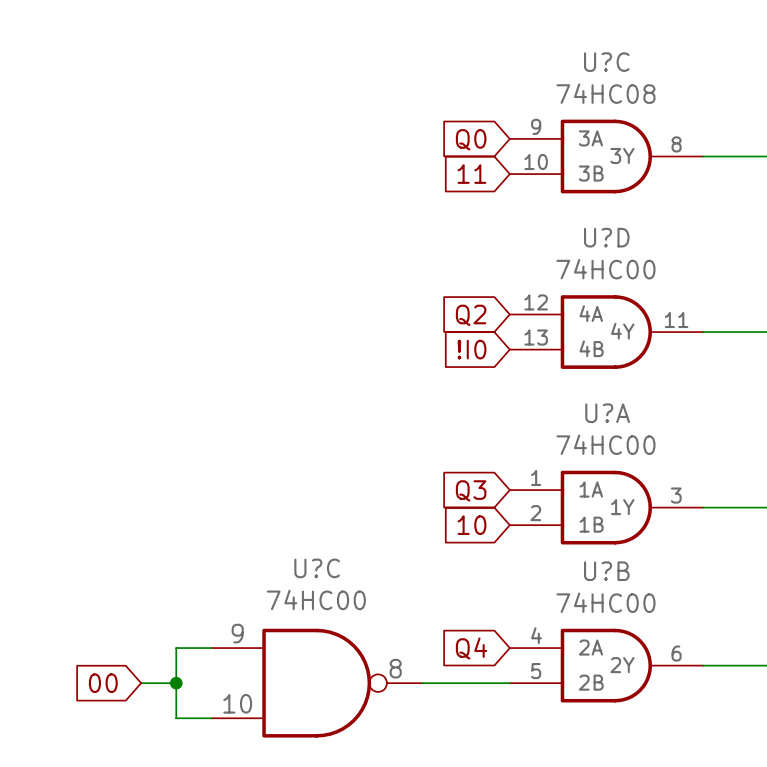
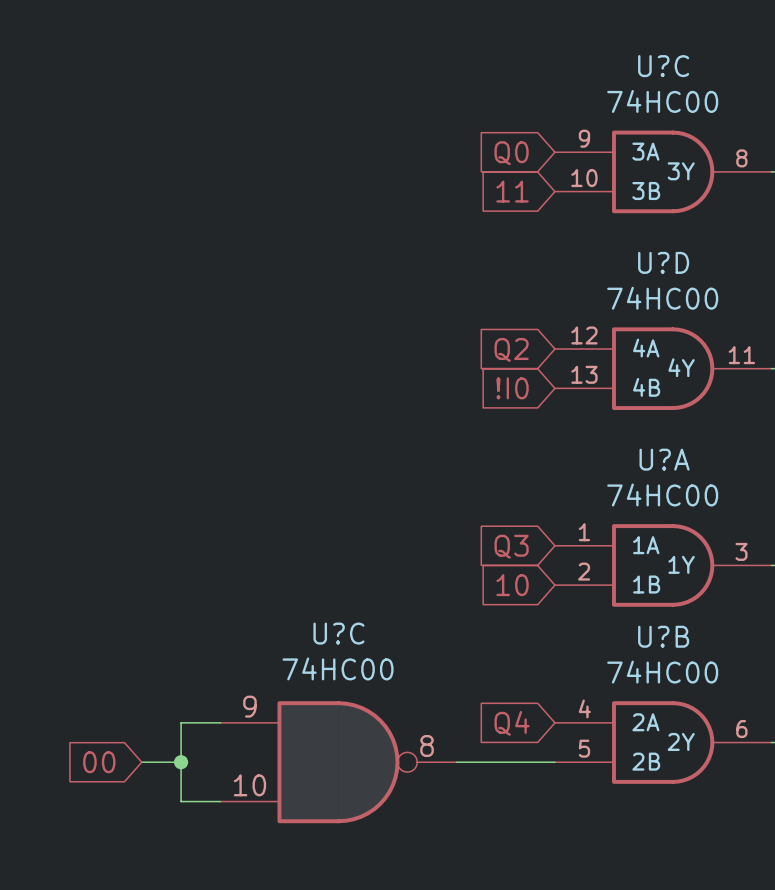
U?C value: 74HC08 (605, 93) -> 74HC00 (662, 101)

